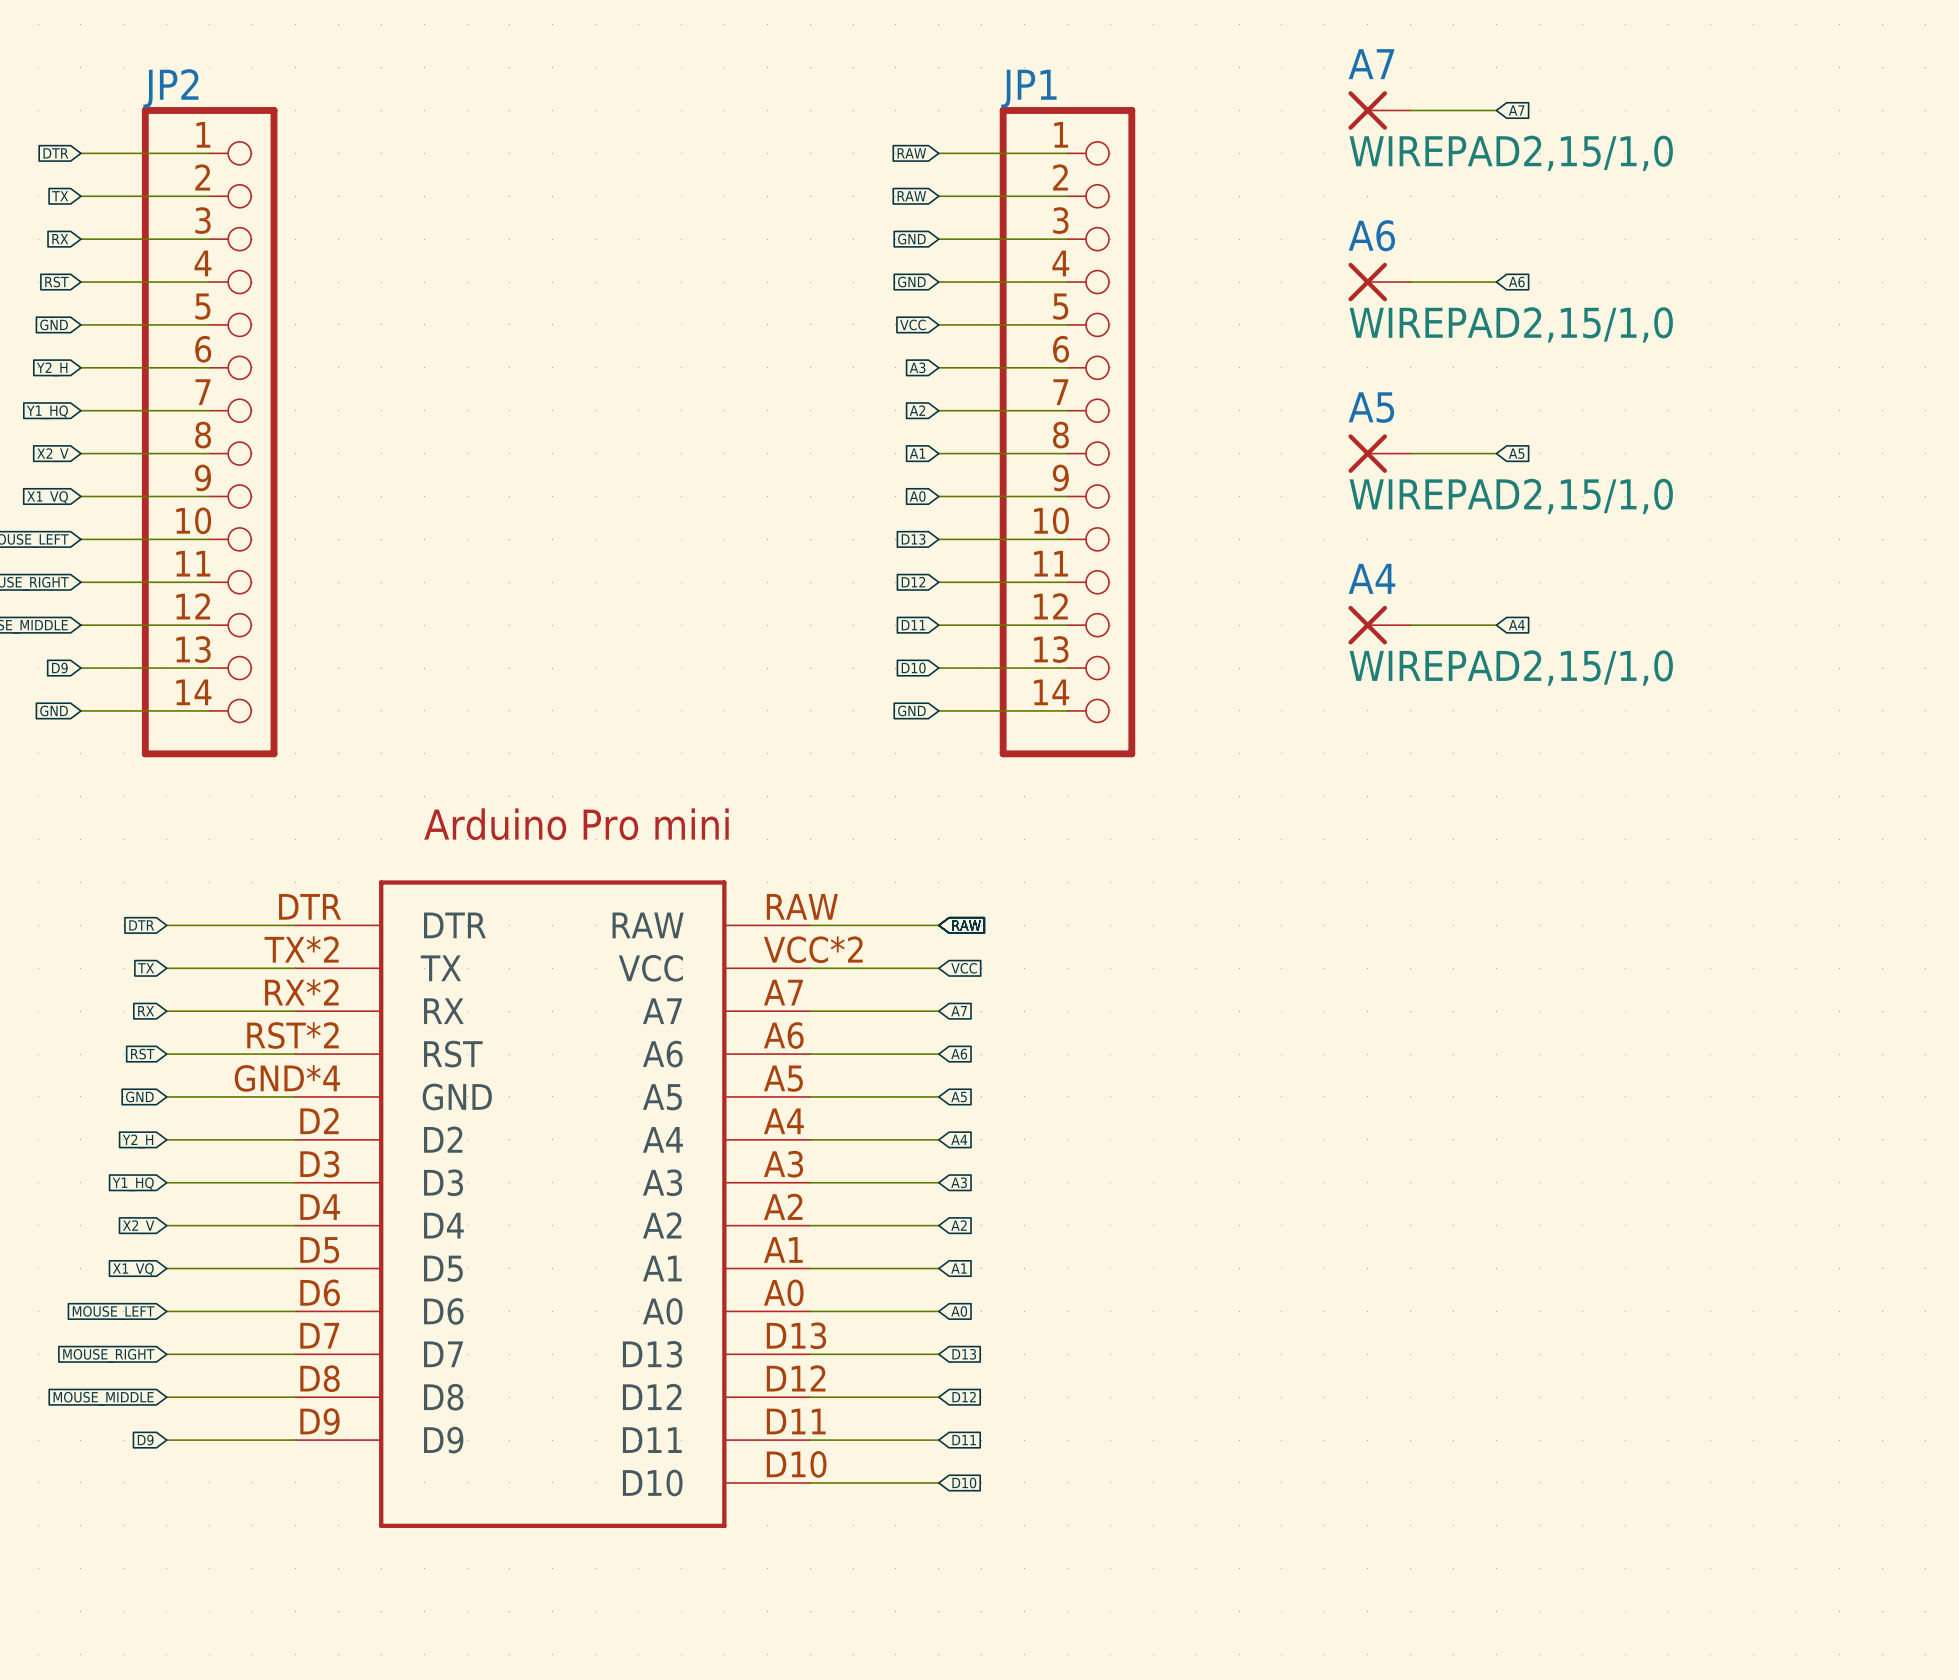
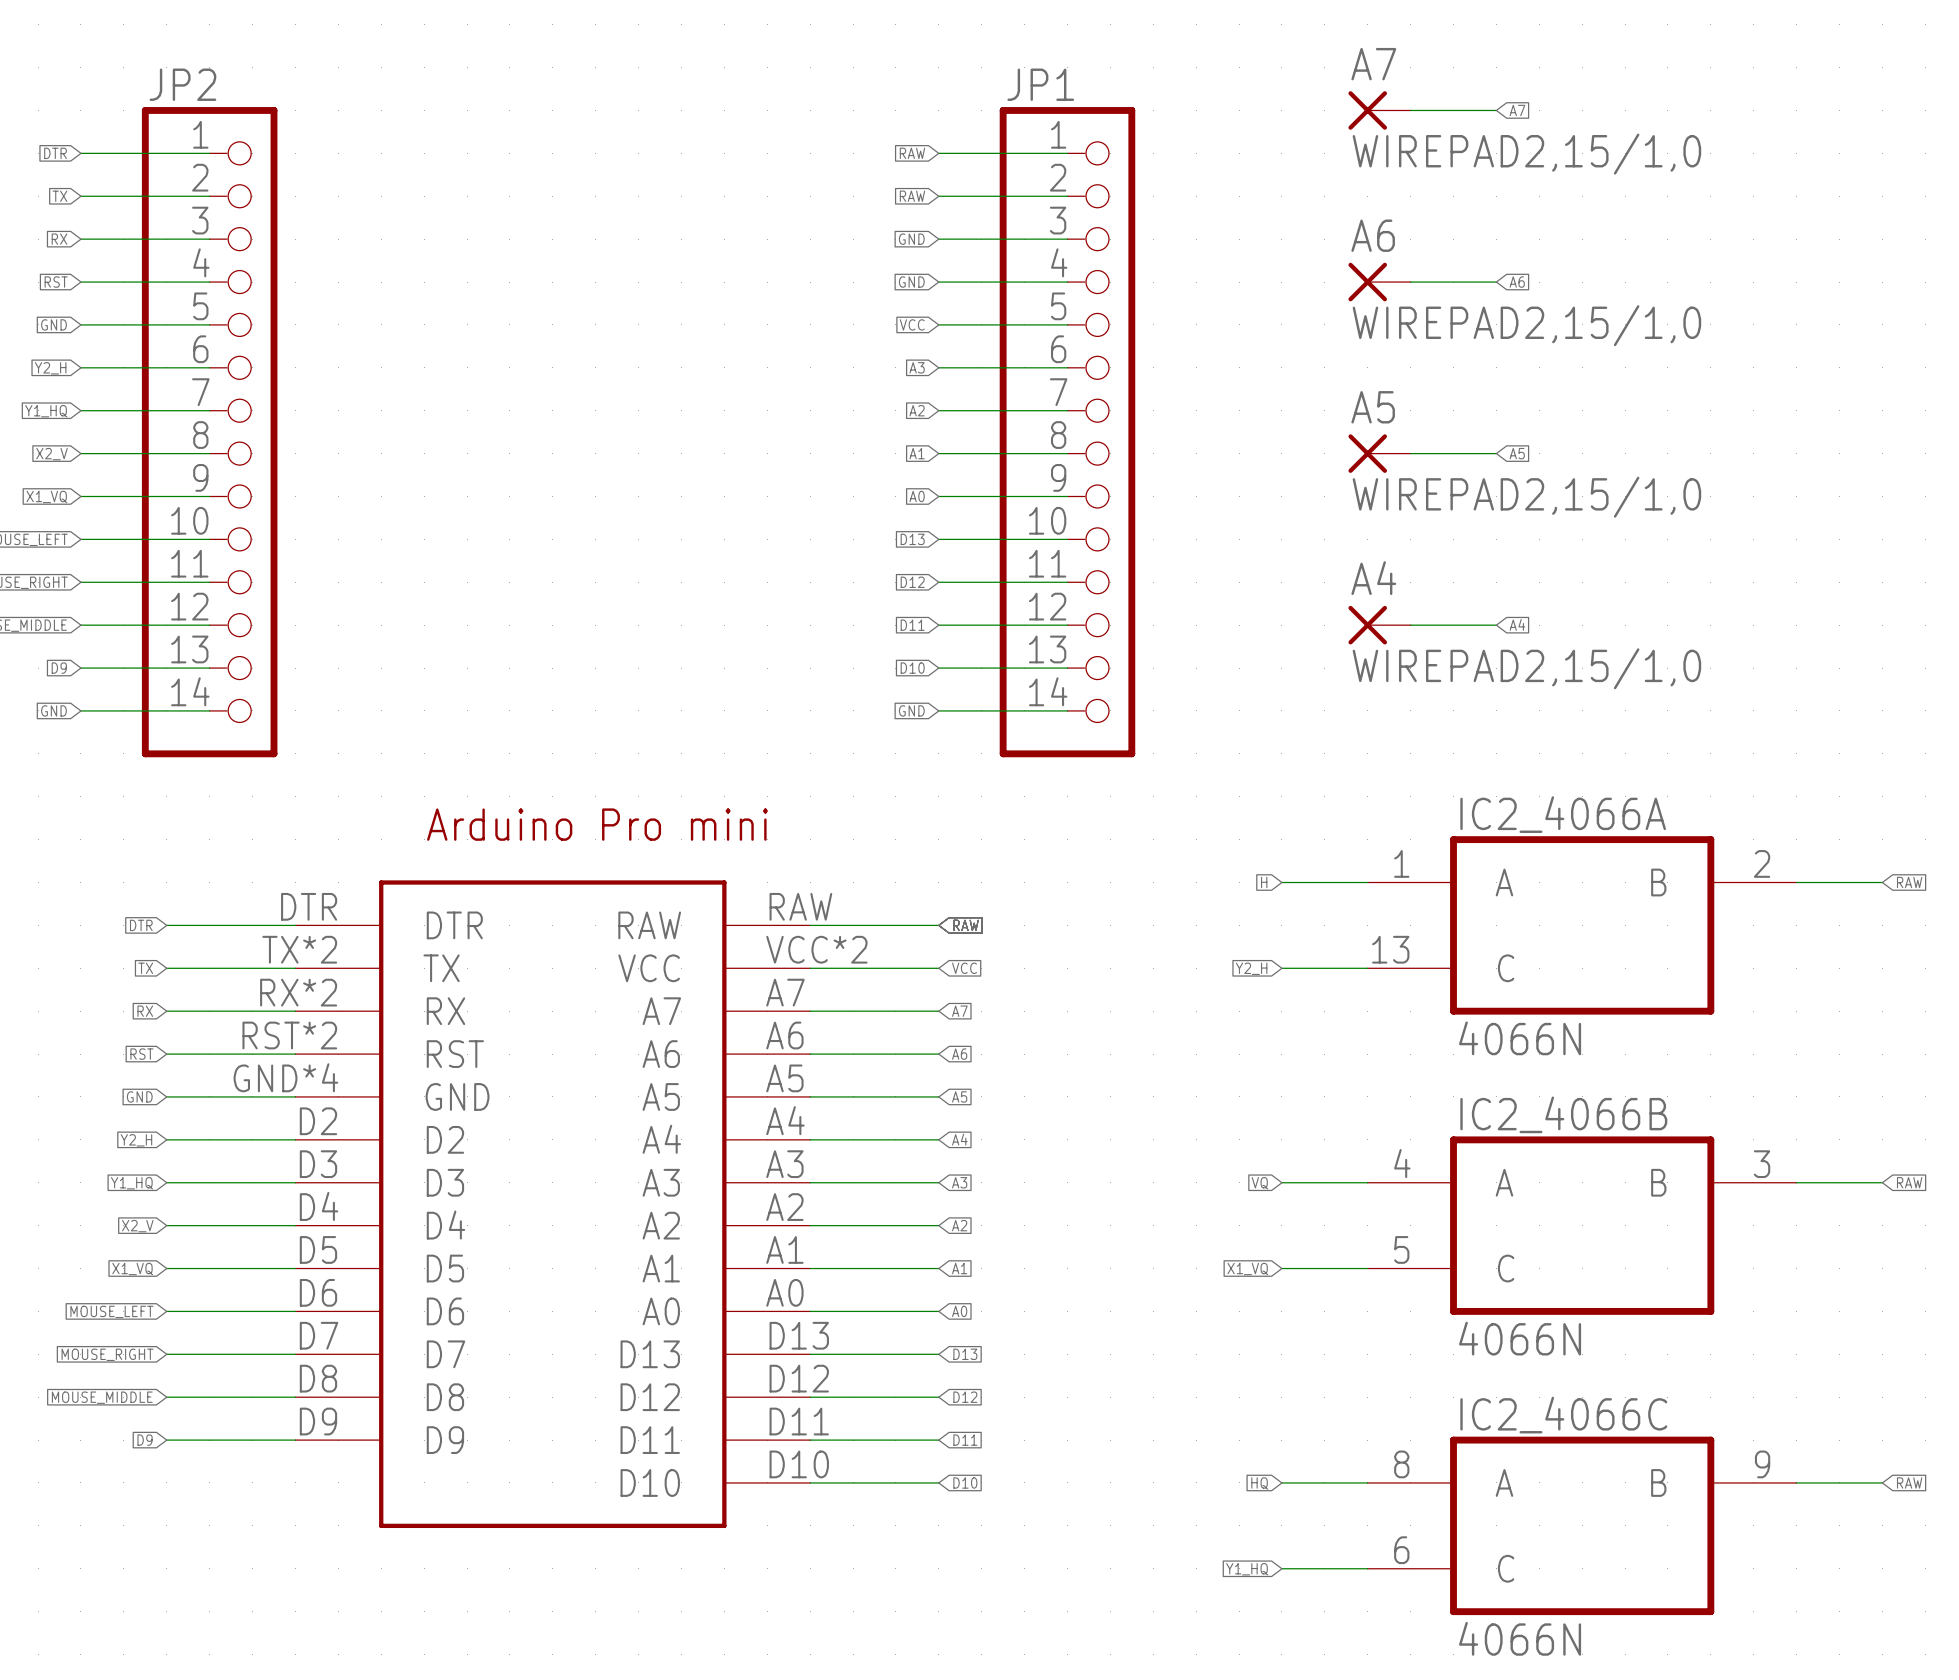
global label: none -> H (1264, 882)
wire: none -> (1281, 882) (1367, 882)
wire: none -> (1796, 882) (1882, 882)
global label: none -> RAW (1909, 882)
IC2_4066A: none -> 4066N (1582, 925)
wire: none -> (1281, 968) (1367, 968)
global label: none -> Y2_H (1251, 968)
wire: none -> (1281, 1182) (1367, 1182)
wire: none -> (1796, 1182) (1882, 1182)
global label: none -> RAW (1909, 1182)
global label: none -> VQ (1259, 1183)
IC2_4066B: none -> 4066N (1582, 1225)
wire: none -> (1281, 1268) (1367, 1268)
global label: none -> X1_VQ (1247, 1269)
wire: none -> (1281, 1482) (1367, 1482)
wire: none -> (1796, 1482) (1882, 1482)
global label: none -> RAW (1909, 1482)
global label: none -> HQ (1259, 1483)
IC2_4066C: none -> 4066N (1582, 1525)
wire: none -> (1281, 1568) (1367, 1568)
global label: none -> Y1_HQ (1247, 1569)

